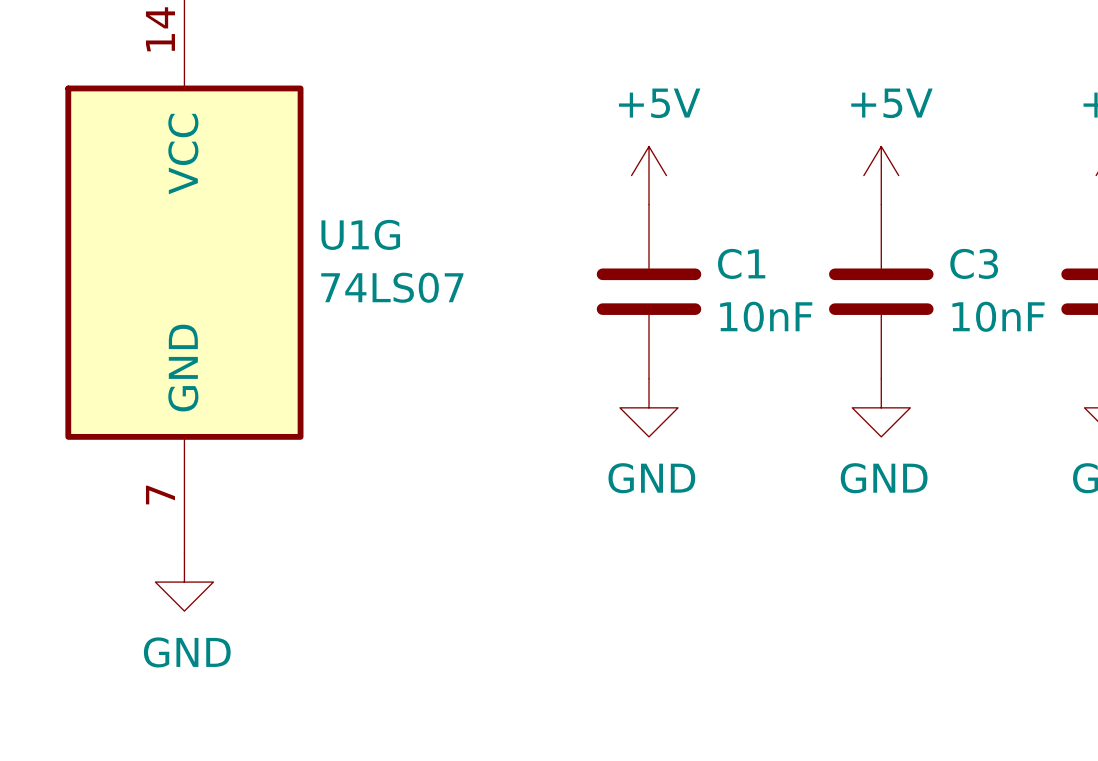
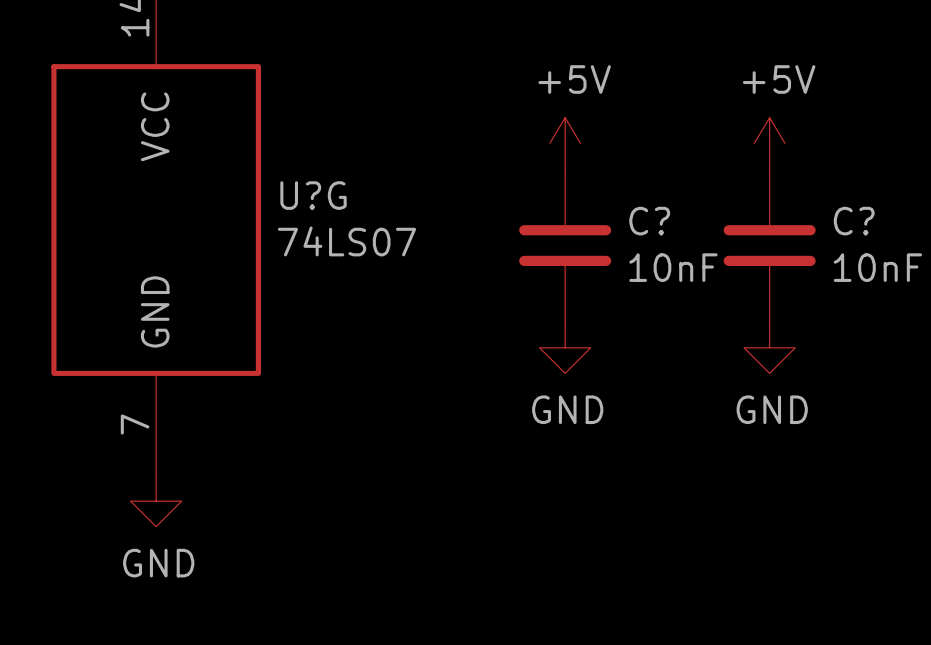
U1G name: U1G (360, 234) -> U?G (313, 195)
C1 name: C1 (741, 263) -> C? (649, 221)
C3 name: C3 (974, 263) -> C? (854, 221)

